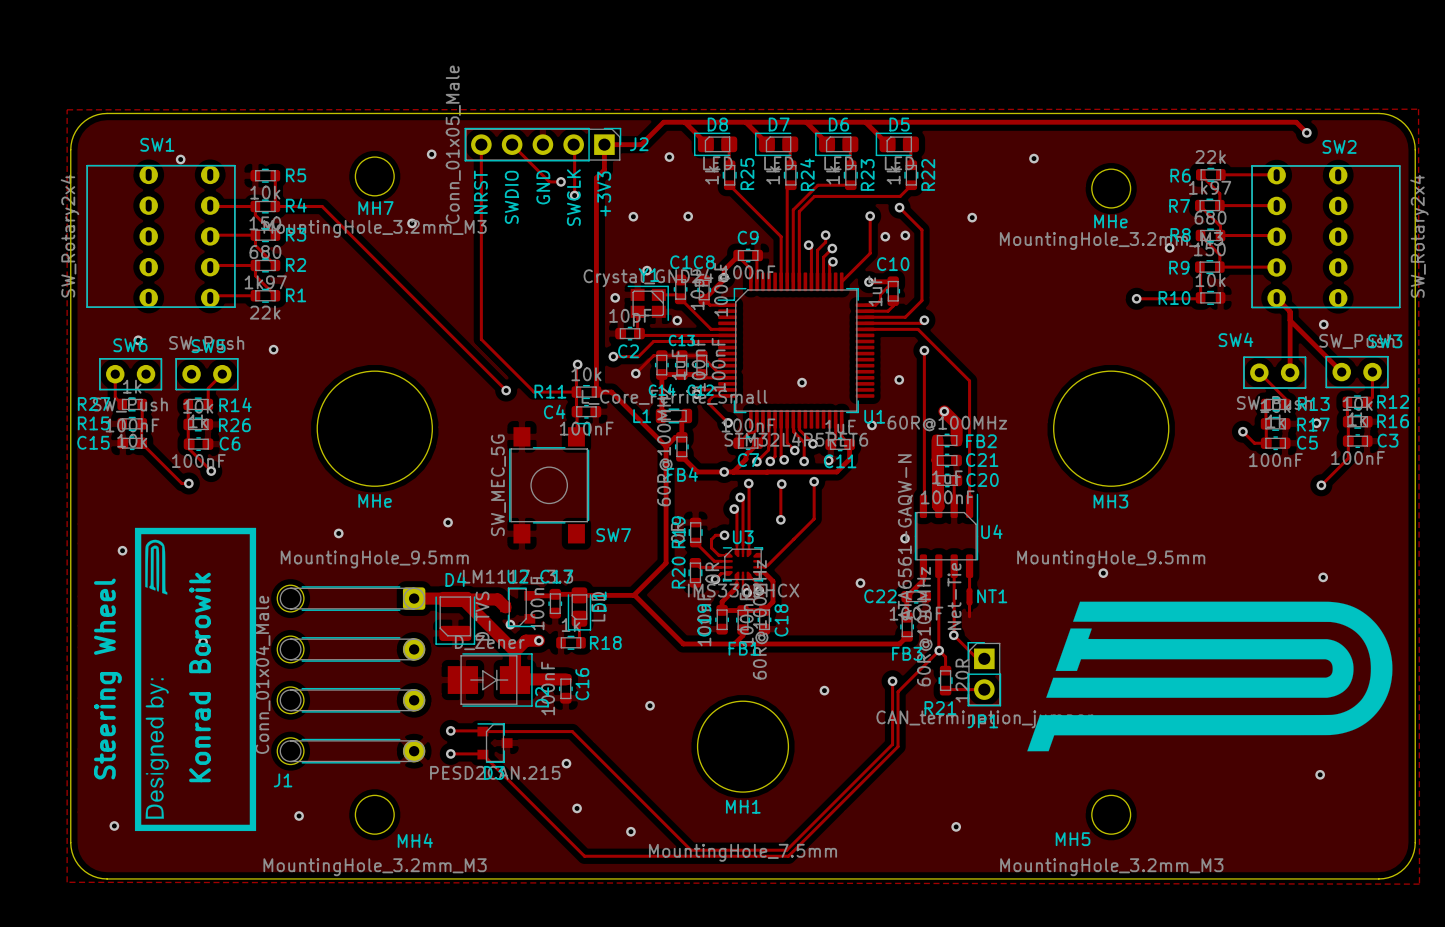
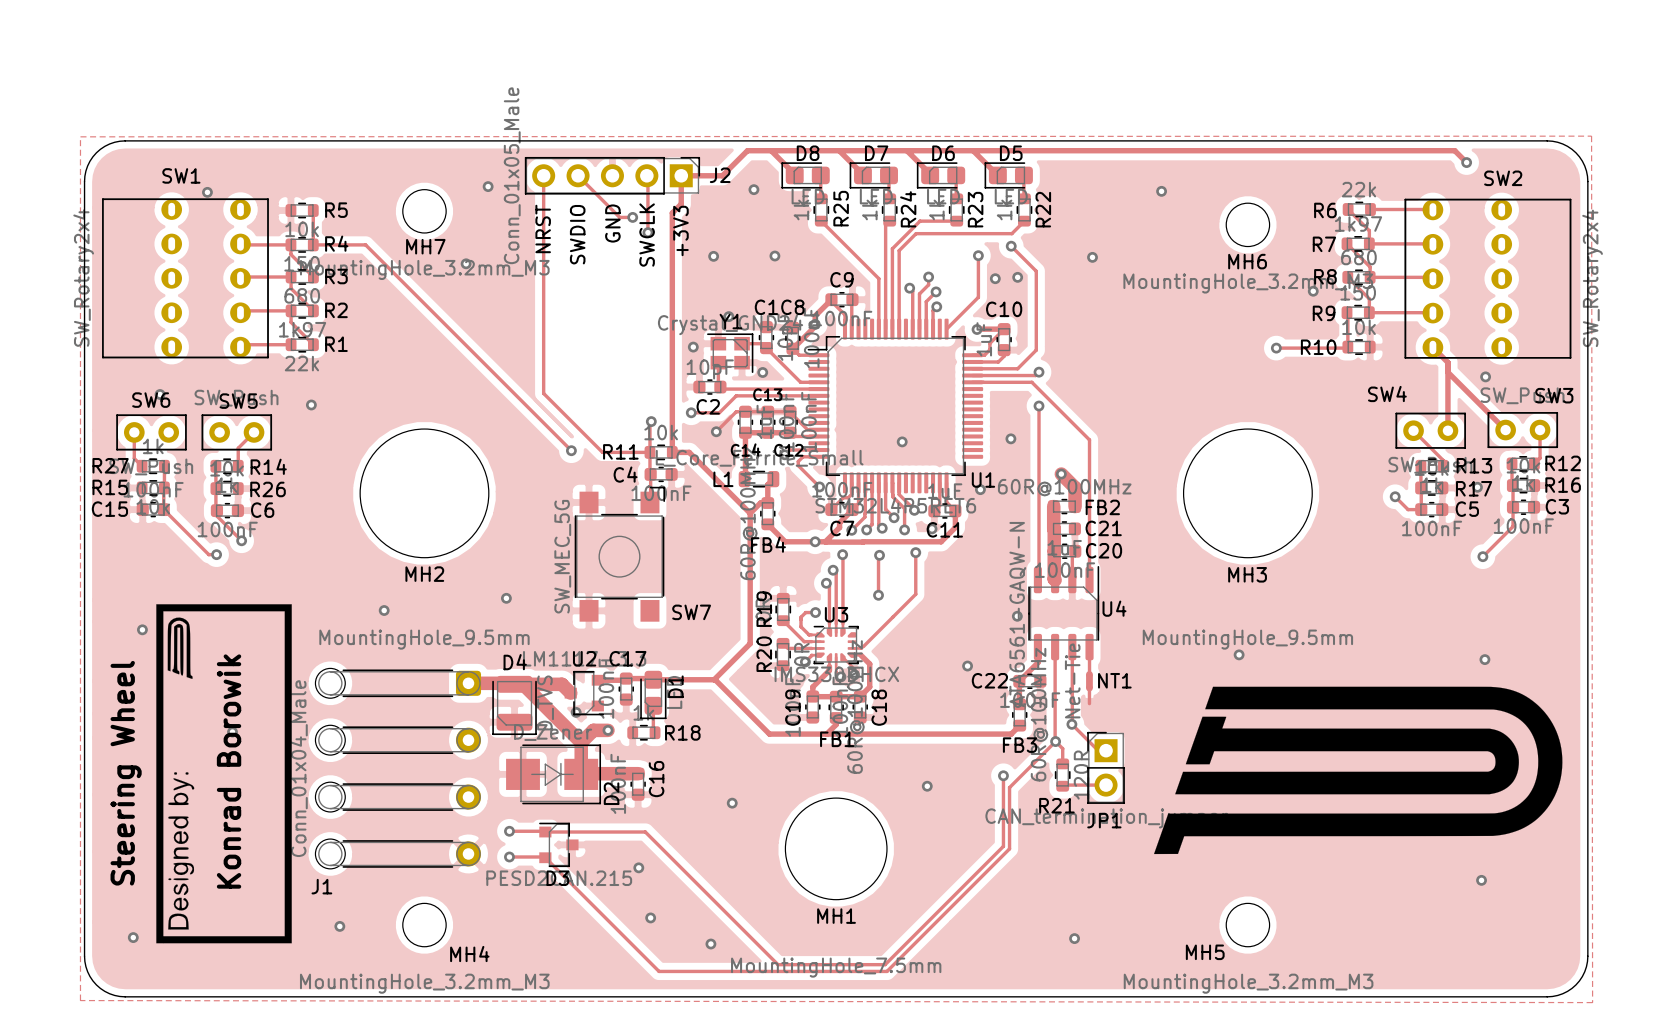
MHe name: MHe (1110, 221) -> MH6 (1247, 261)
MHe name: MHe (375, 500) -> MH2 (424, 574)

